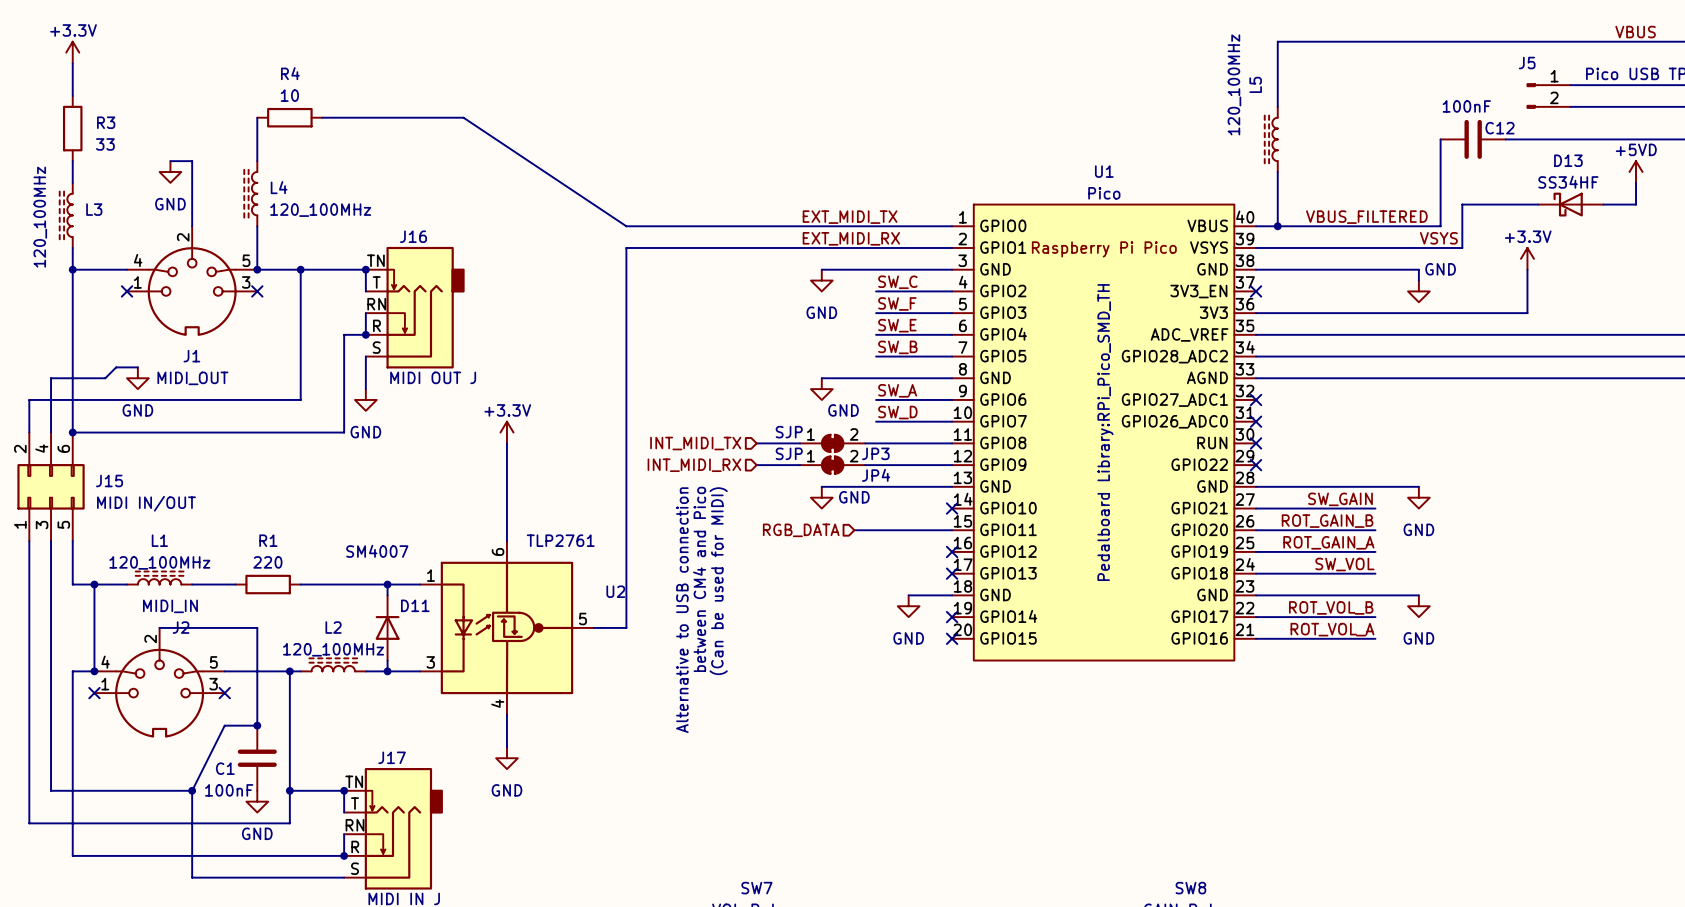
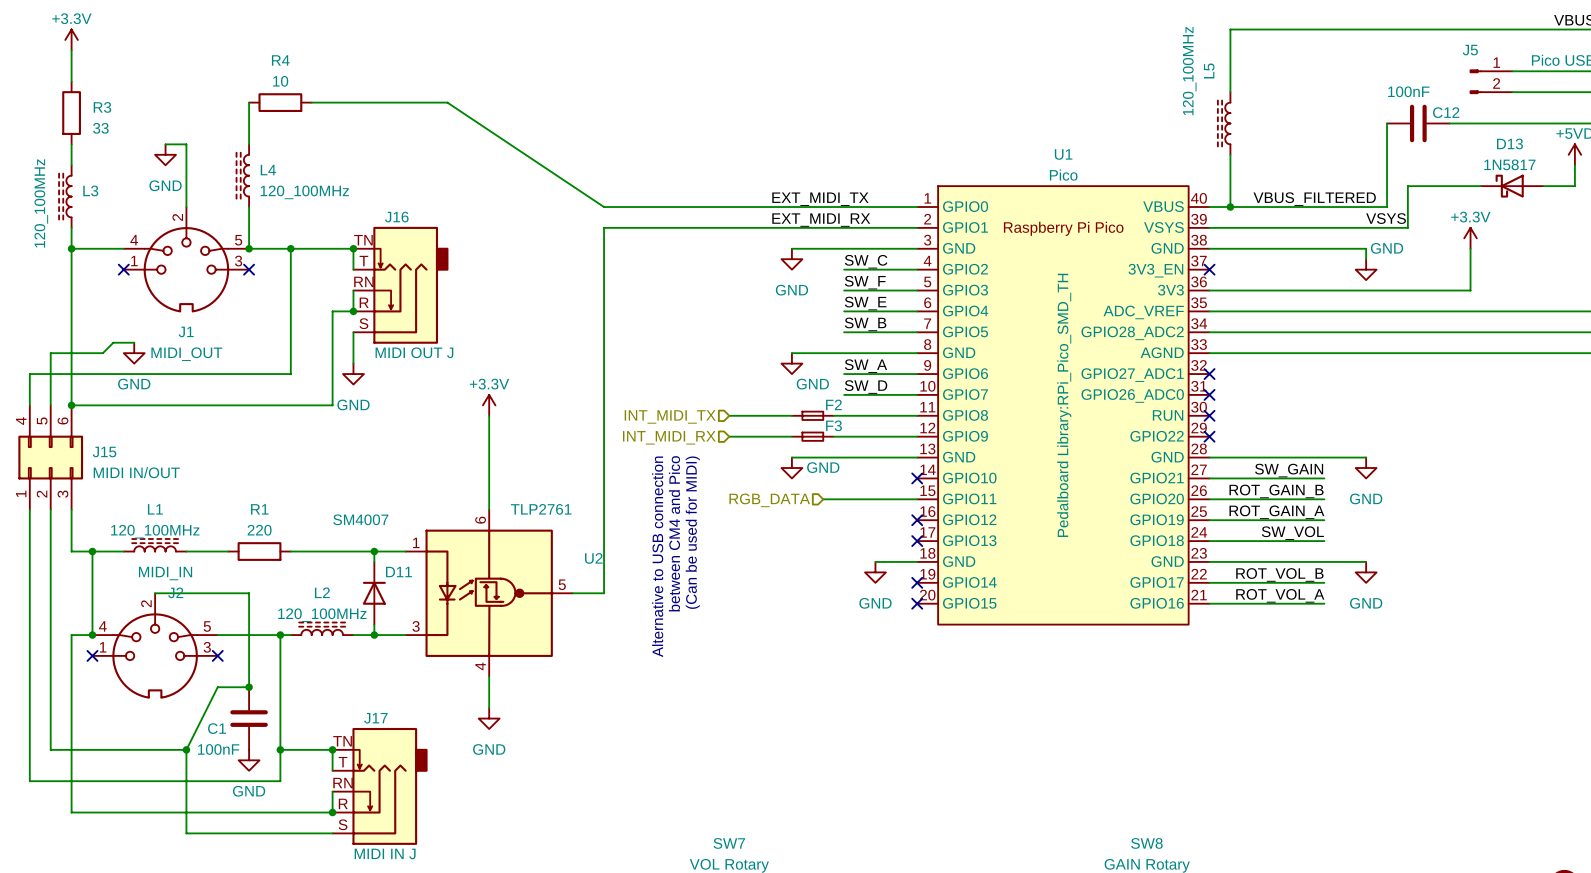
D13 value: SS34HF (1568, 182) -> 1N5817 (1509, 164)
JP3: SJP (832, 443) -> none
F2: none -> (812, 415)
J15 pin number: 4 (41, 448) -> 5 (42, 421)
J15 pin number: 2 (20, 449) -> 4 (21, 421)
JP4: SJP (832, 465) -> none
F3: none -> (812, 436)
J15 pin number: 5 (63, 524) -> 3 (62, 494)
J15 pin number: 3 (42, 525) -> 2 (42, 494)

